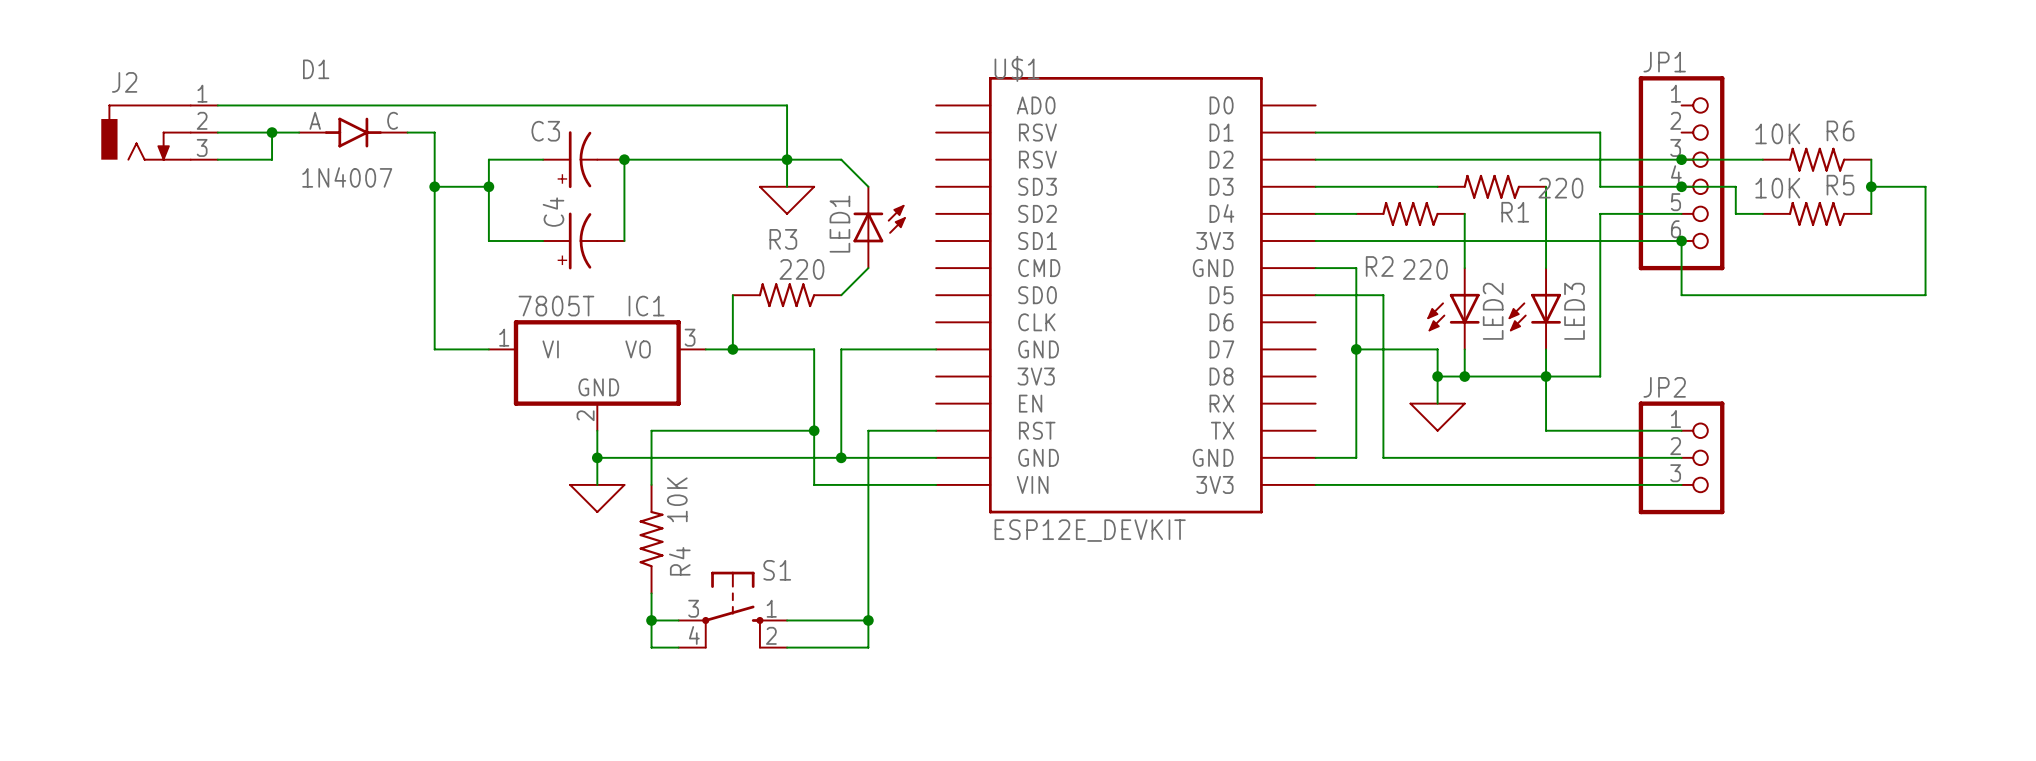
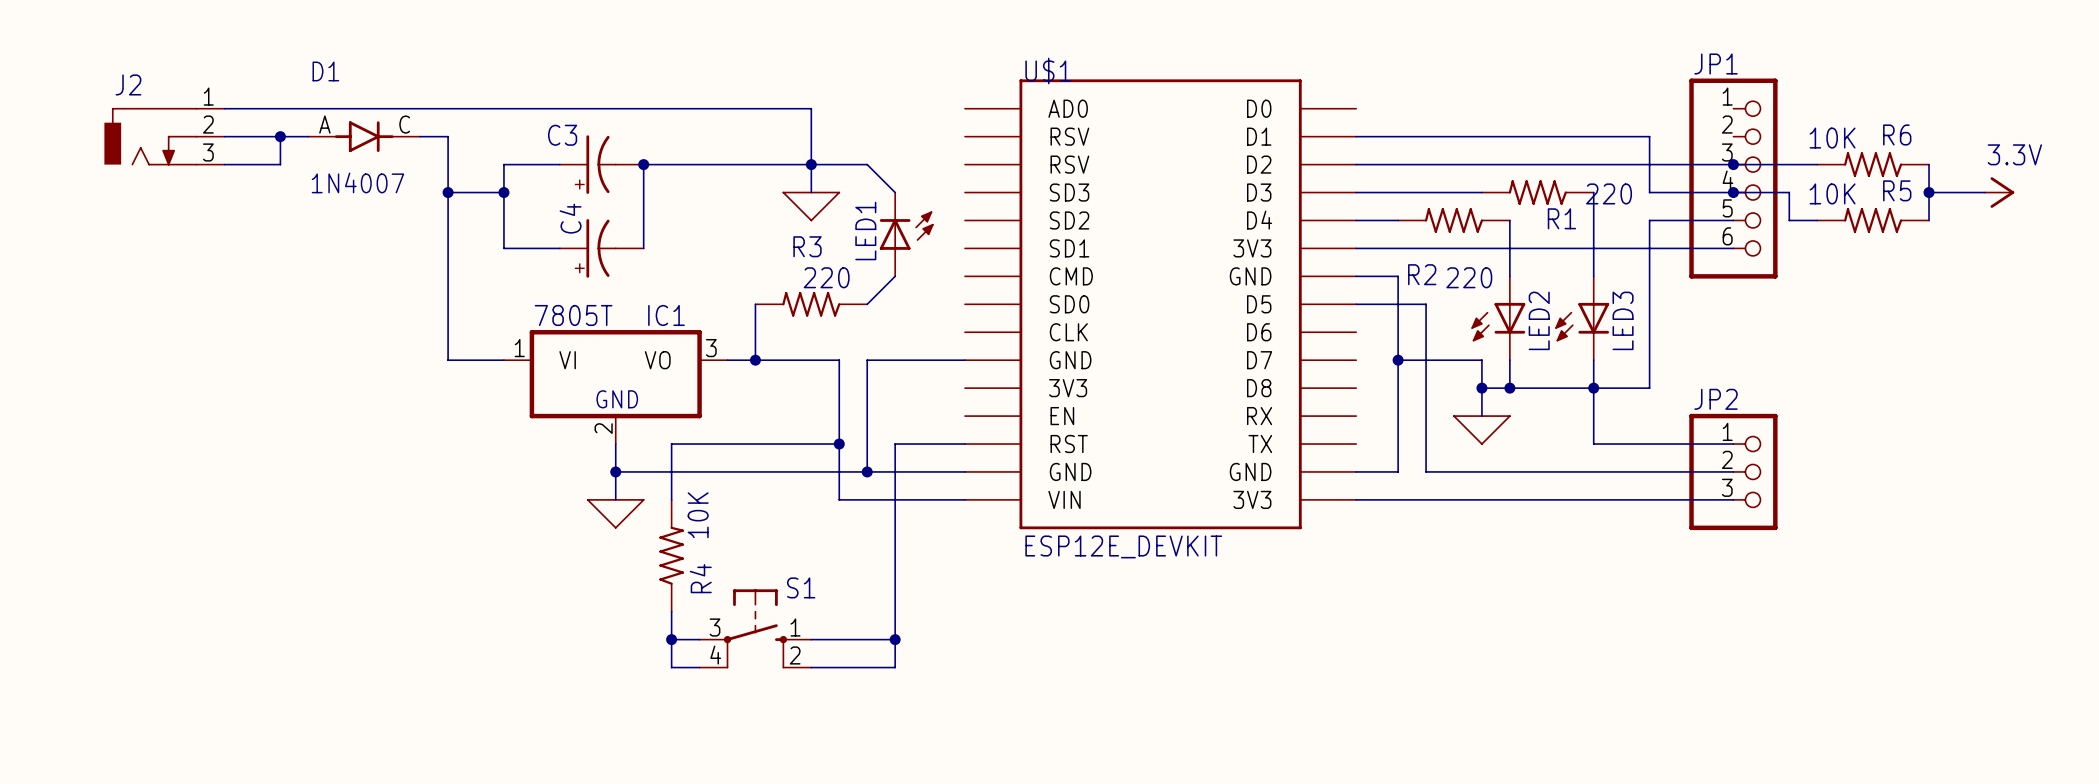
wire: (1925, 186) (1925, 295) (1681, 295) (1681, 240) -> none
power symbol: none -> 3.3V (1999, 192)
junction: (1681, 240) -> none

